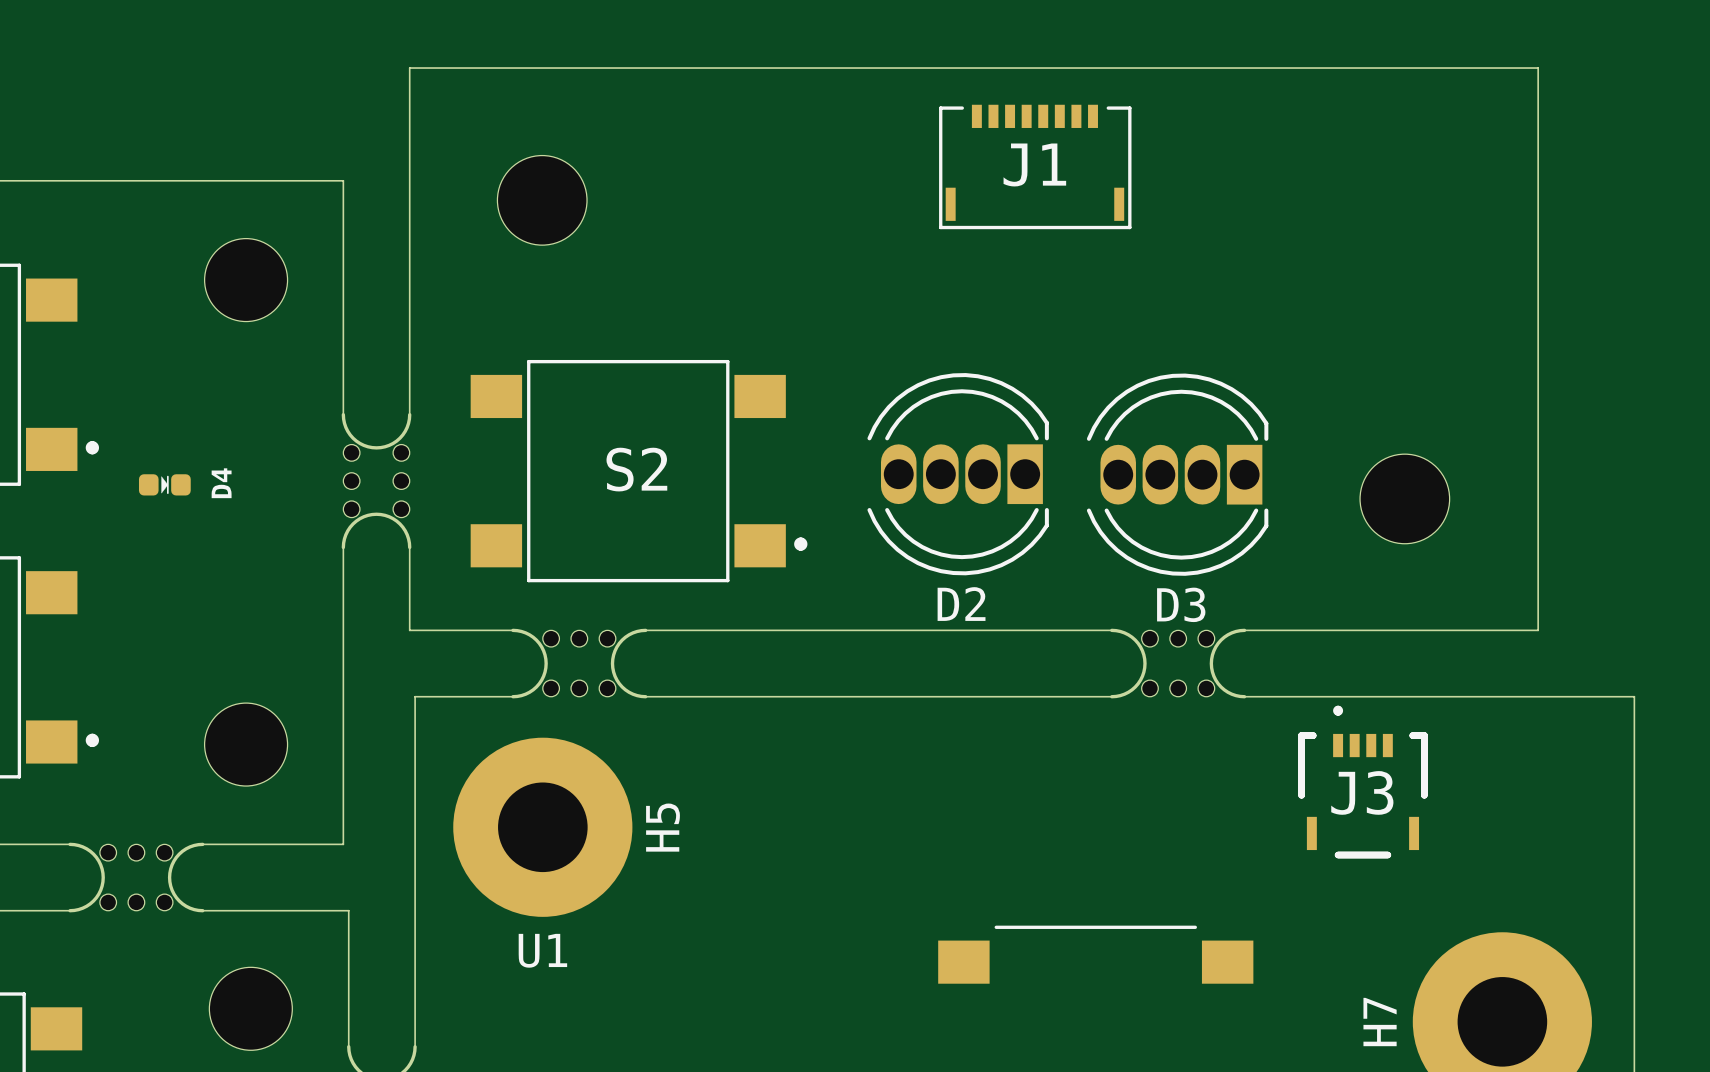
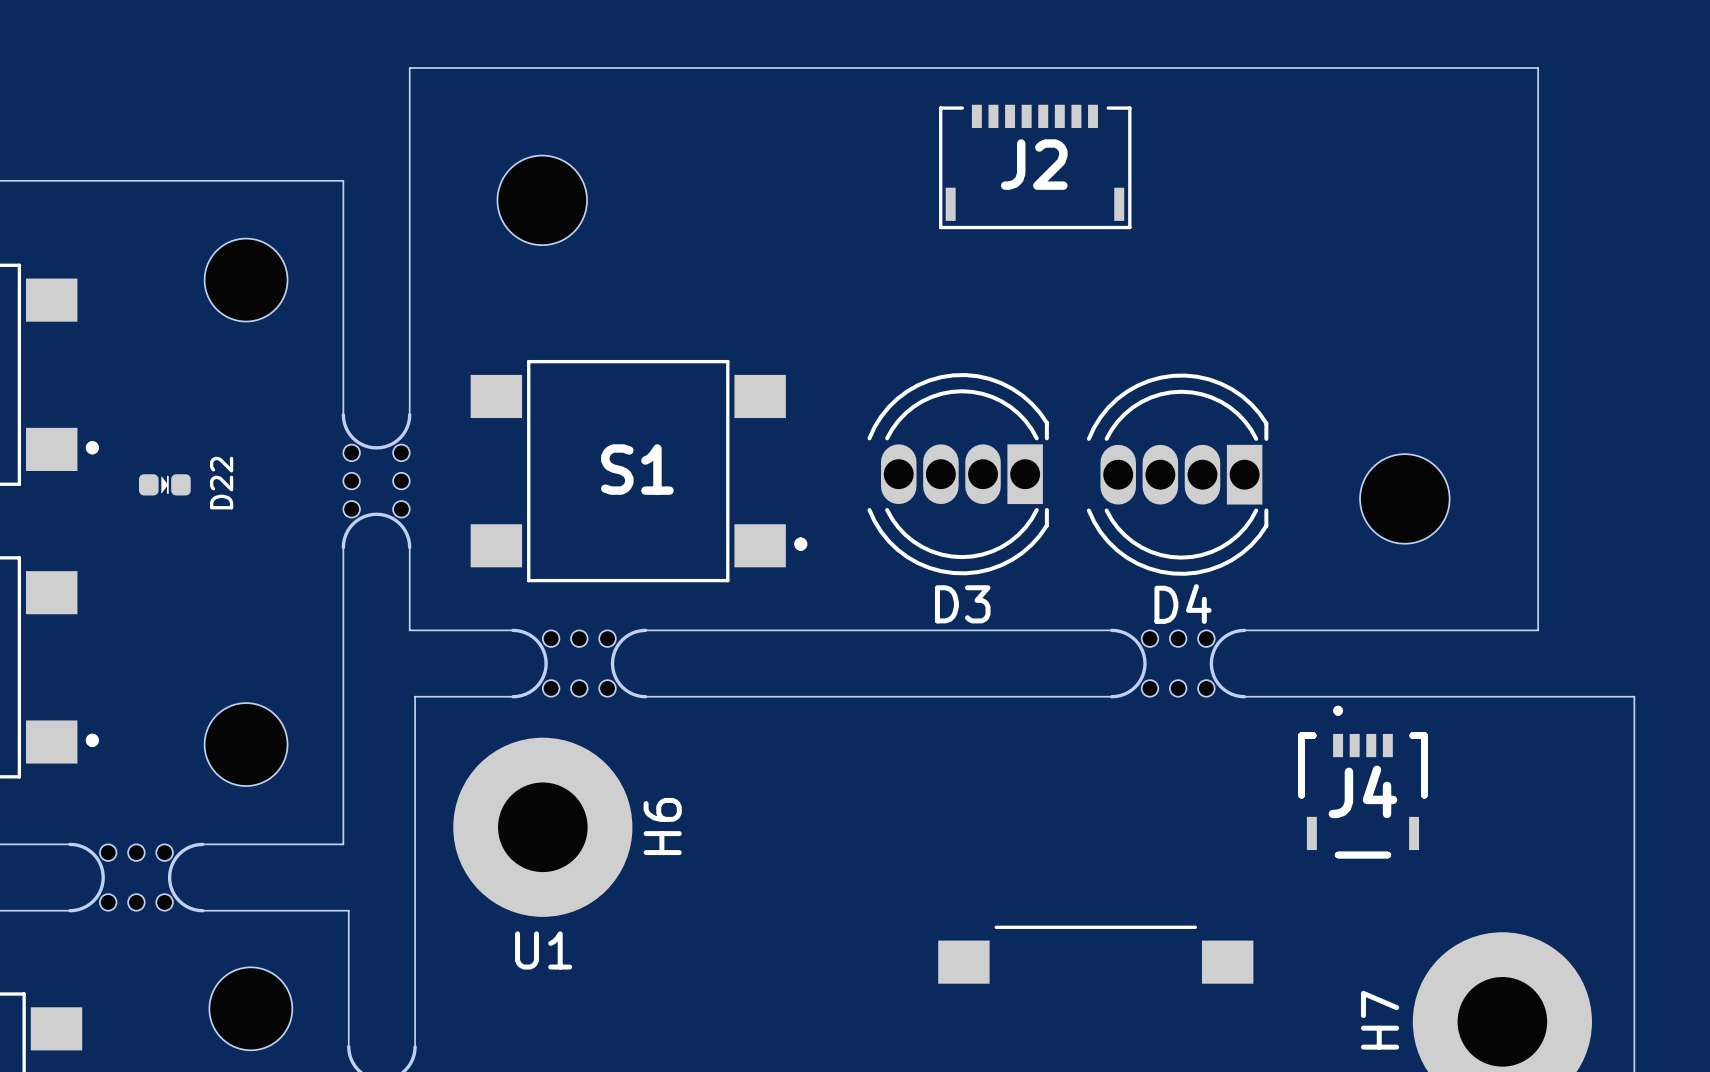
J1 name: J1 (1034, 164) -> J2 (1034, 164)
S2 name: S2 (636, 469) -> S1 (637, 469)
D4 name: D4 (221, 483) -> D22 (221, 483)
D2 name: D2 (961, 604) -> D3 (962, 604)
D3 name: D3 (1181, 604) -> D4 (1183, 604)
J3 name: J3 (1362, 792) -> J4 (1362, 791)
H5 name: H5 (663, 827) -> H6 (662, 826)

